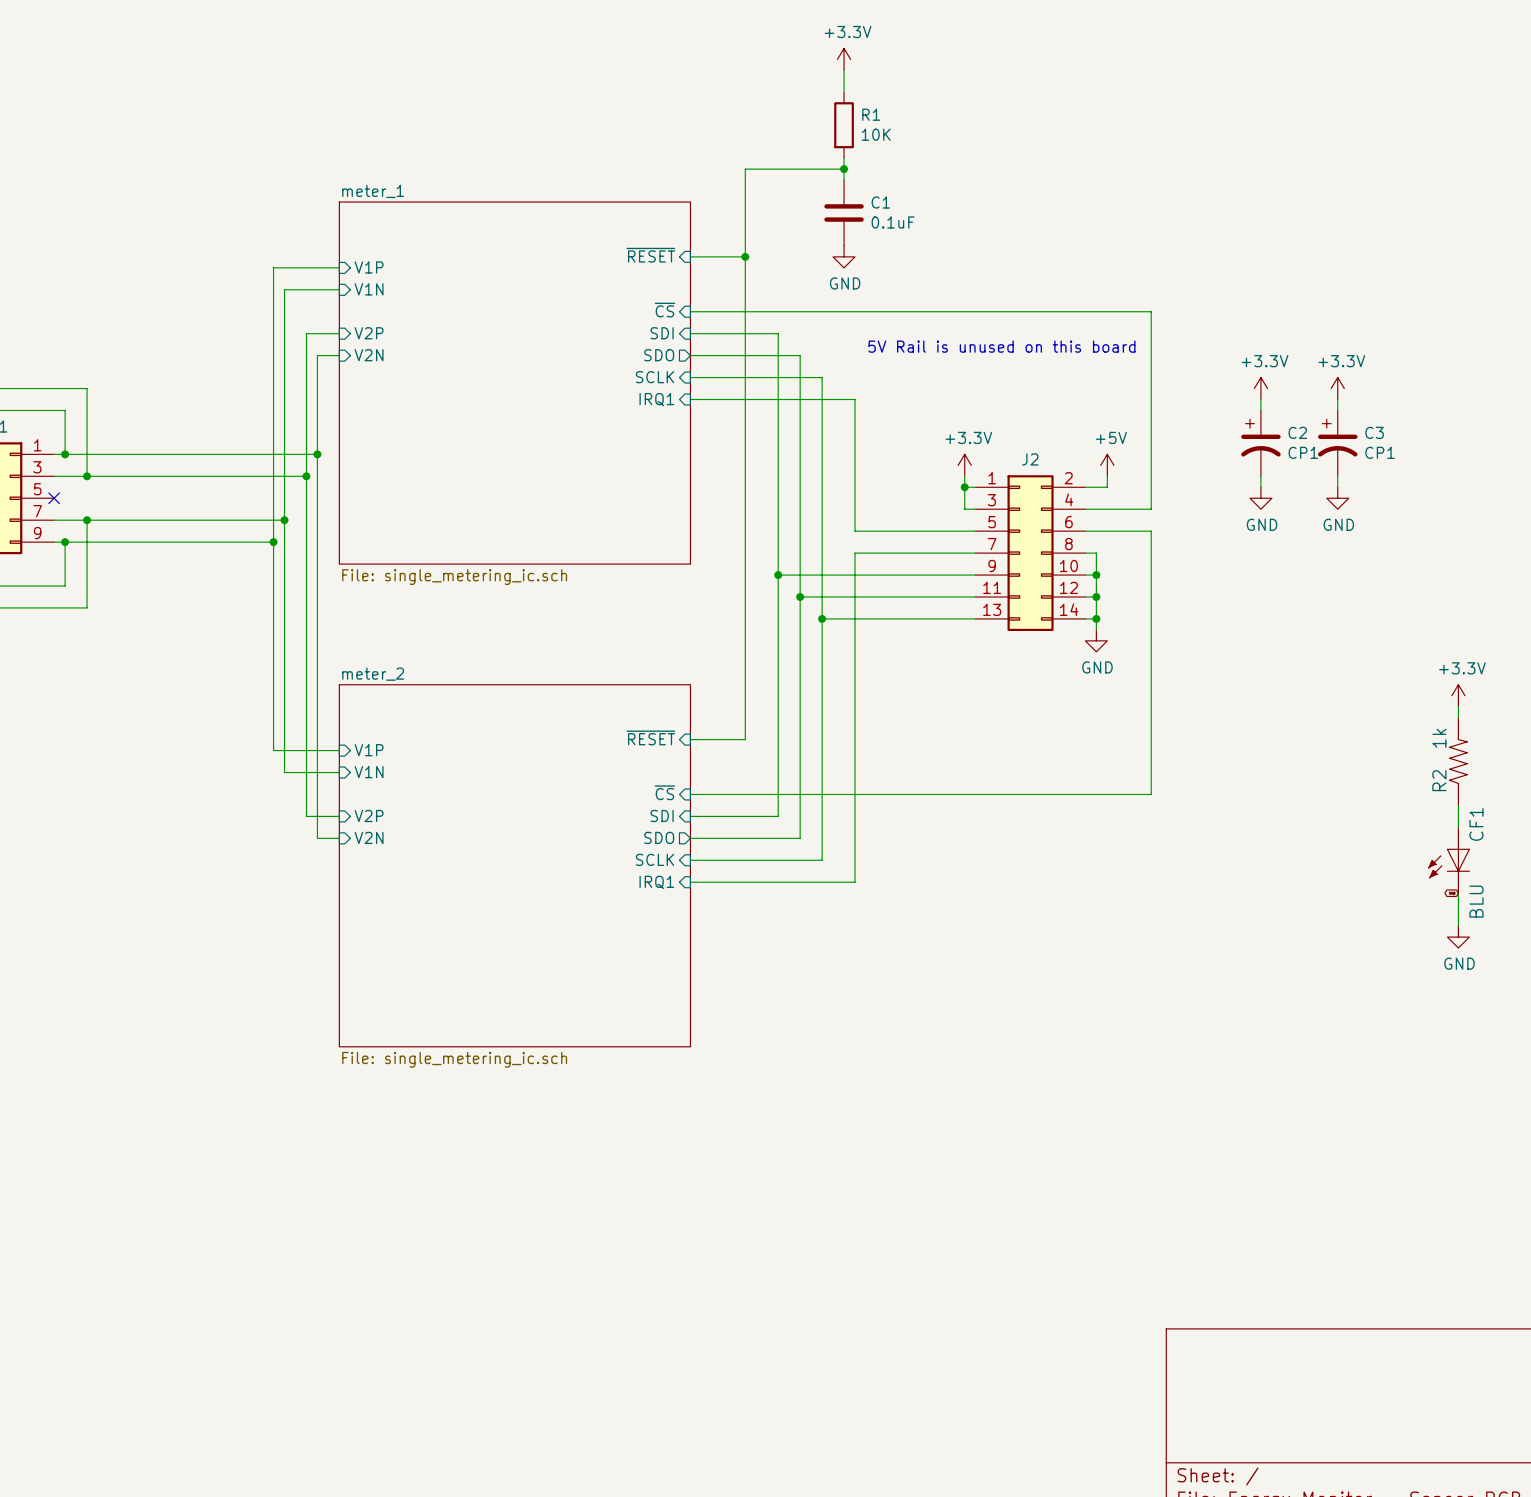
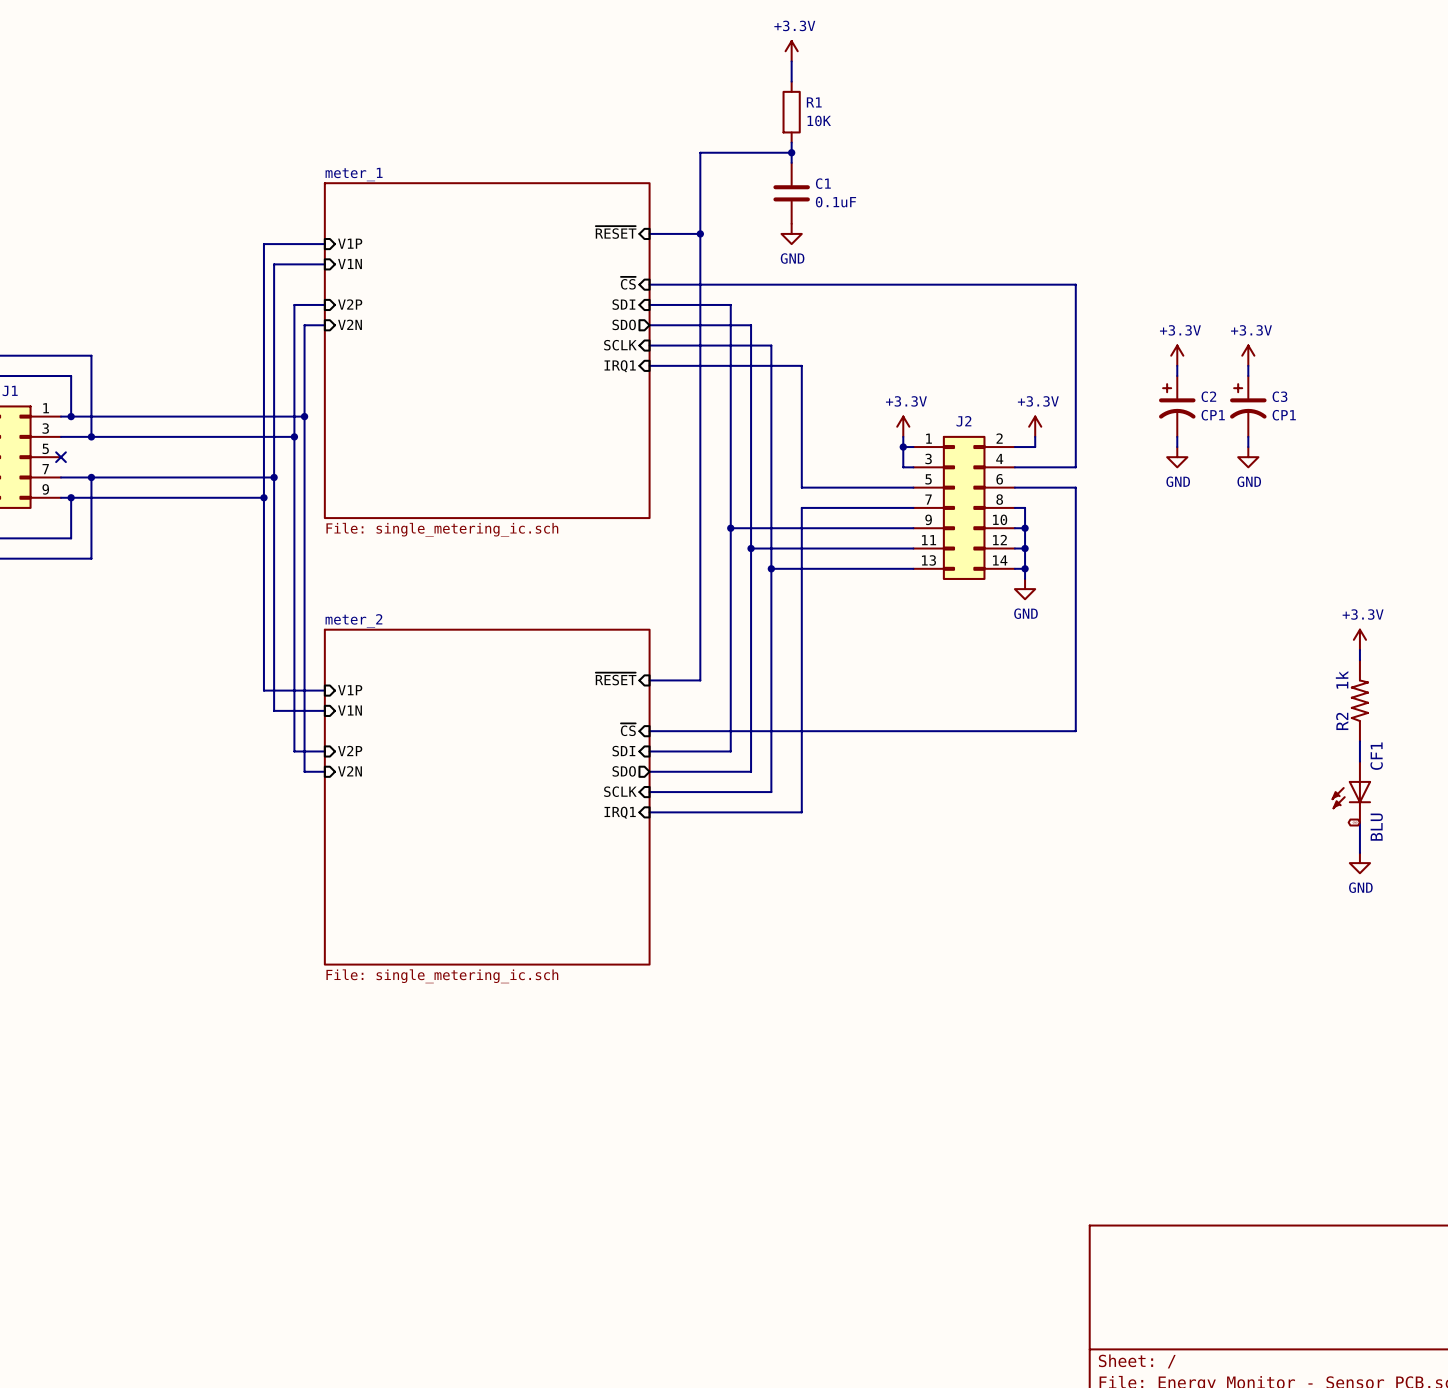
text: 5V Rail is unused on this board (1001, 346) -> none
power symbol: +5V (1107, 465) -> +3.3V (1035, 426)

